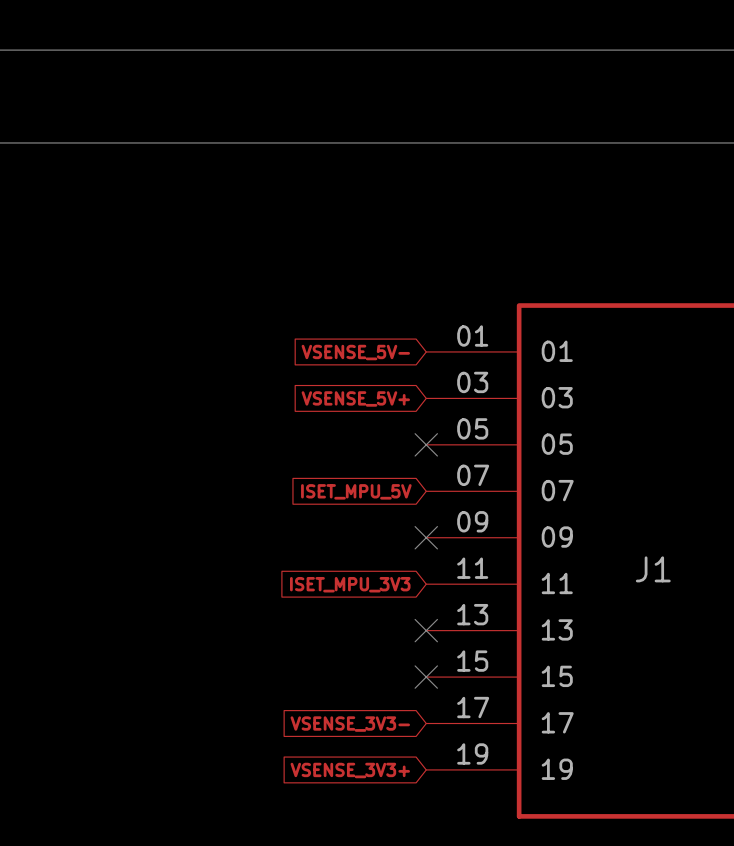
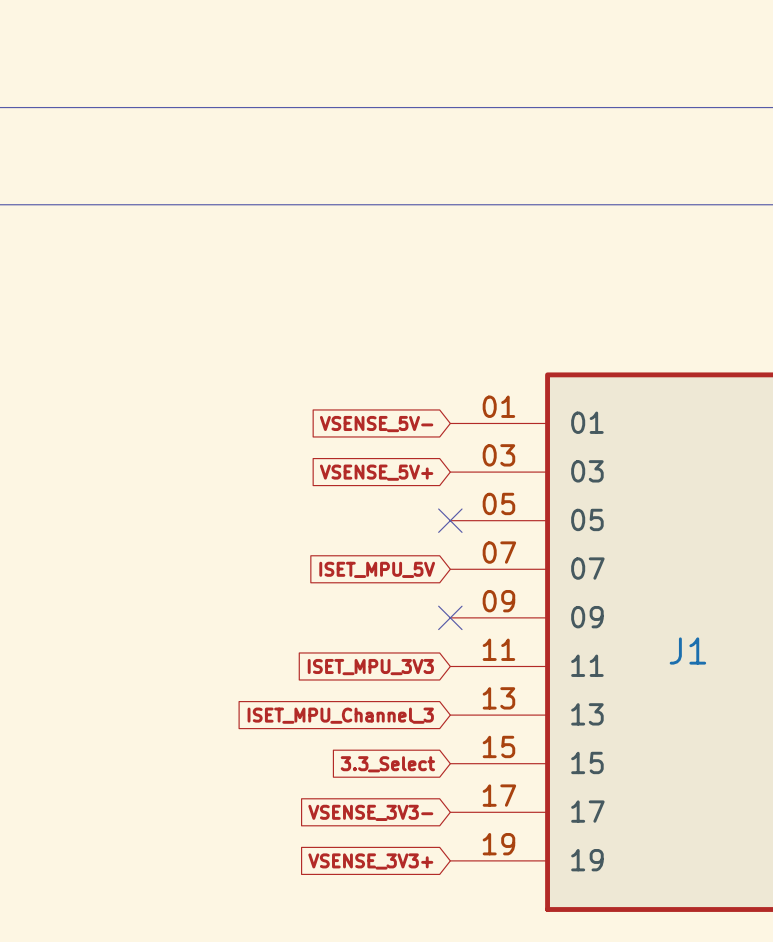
no-connect mark: (426, 630) -> none
global label: none -> ISET_MPU_Channel_3 (340, 715)
global label: none -> 3.3_Select (387, 764)
no-connect mark: (426, 677) -> none

